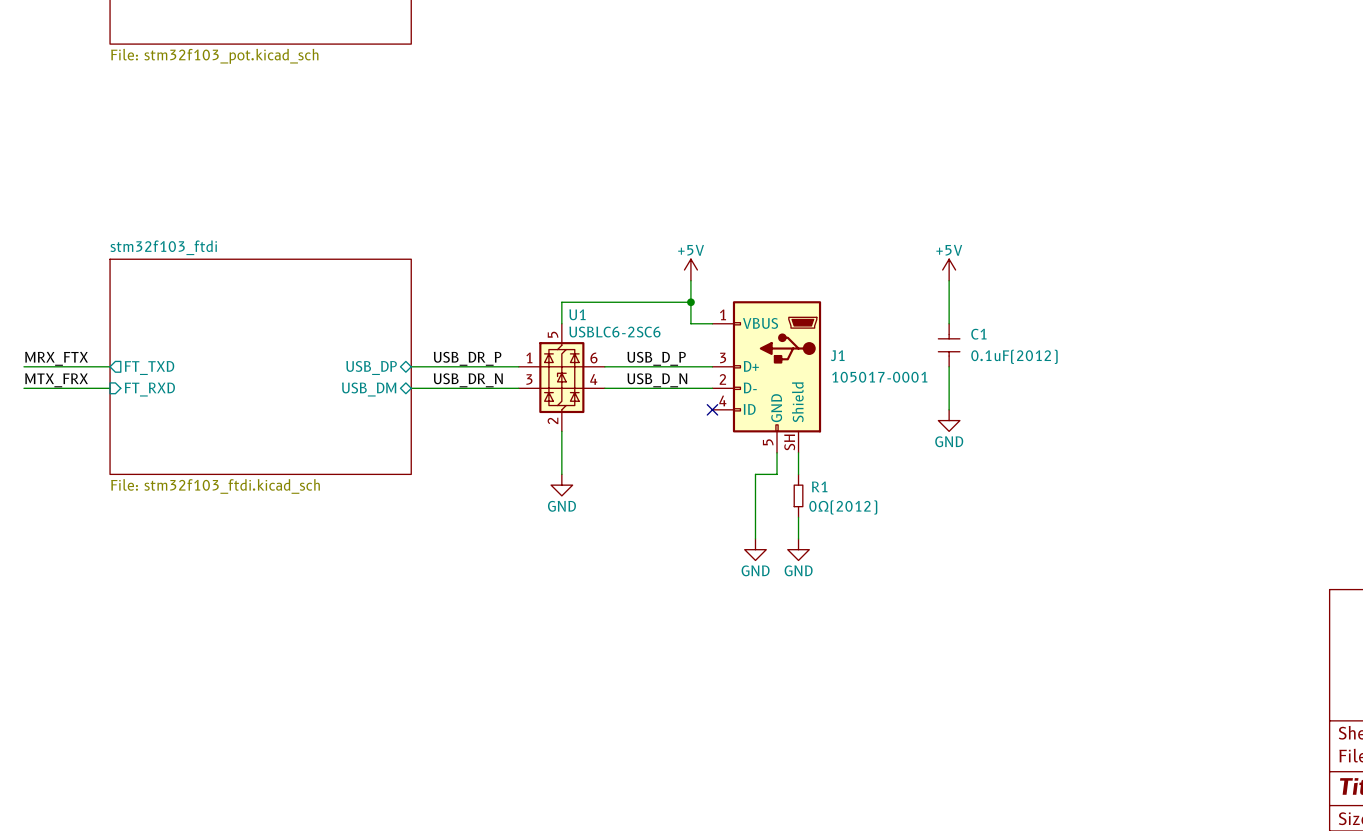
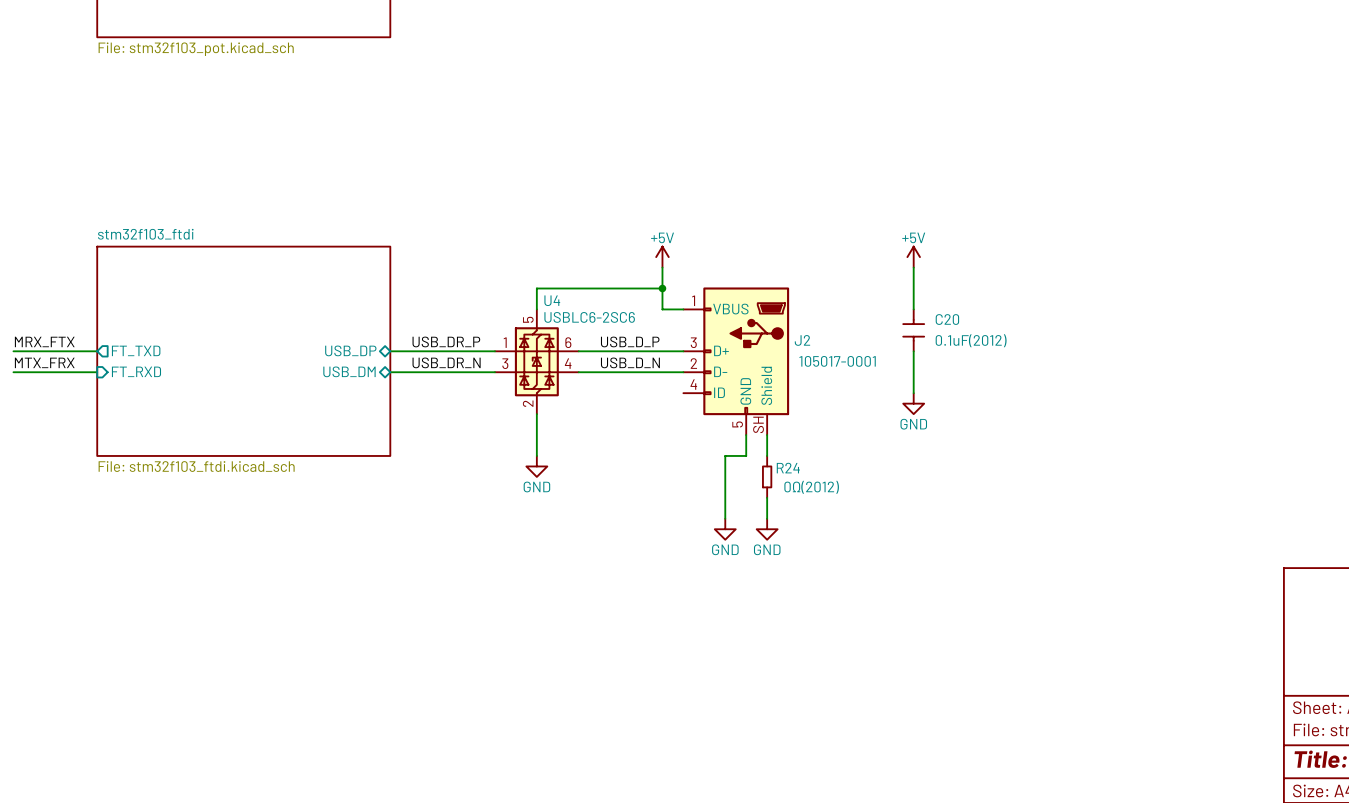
U1 name: U1 (577, 314) -> U4 (552, 300)
C1 name: C1 (978, 334) -> C20 (947, 319)
J1 name: J1 (837, 355) -> J2 (802, 340)
no-connect mark: (712, 409) -> none
R1 name: R1 (819, 486) -> R24 (788, 468)

